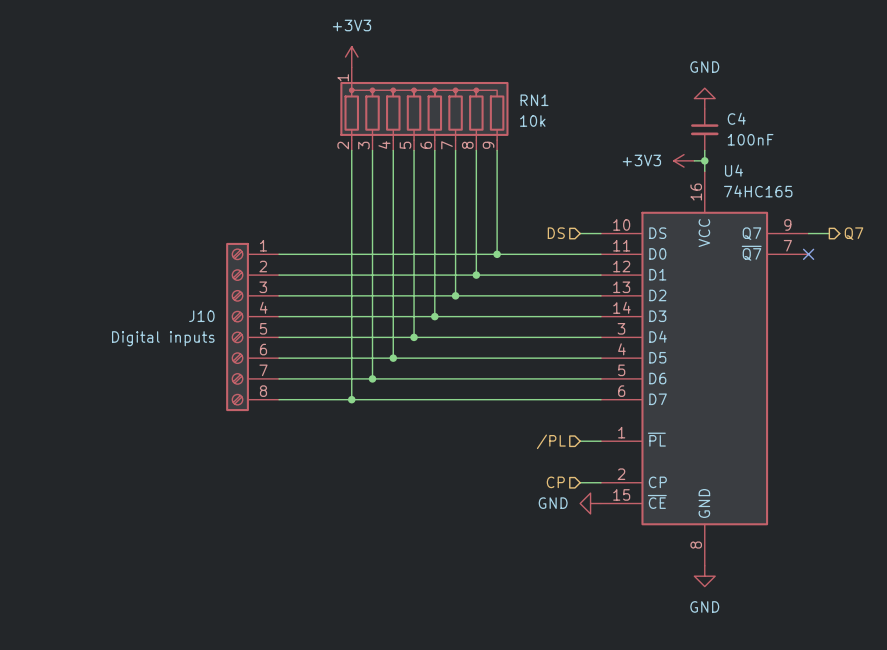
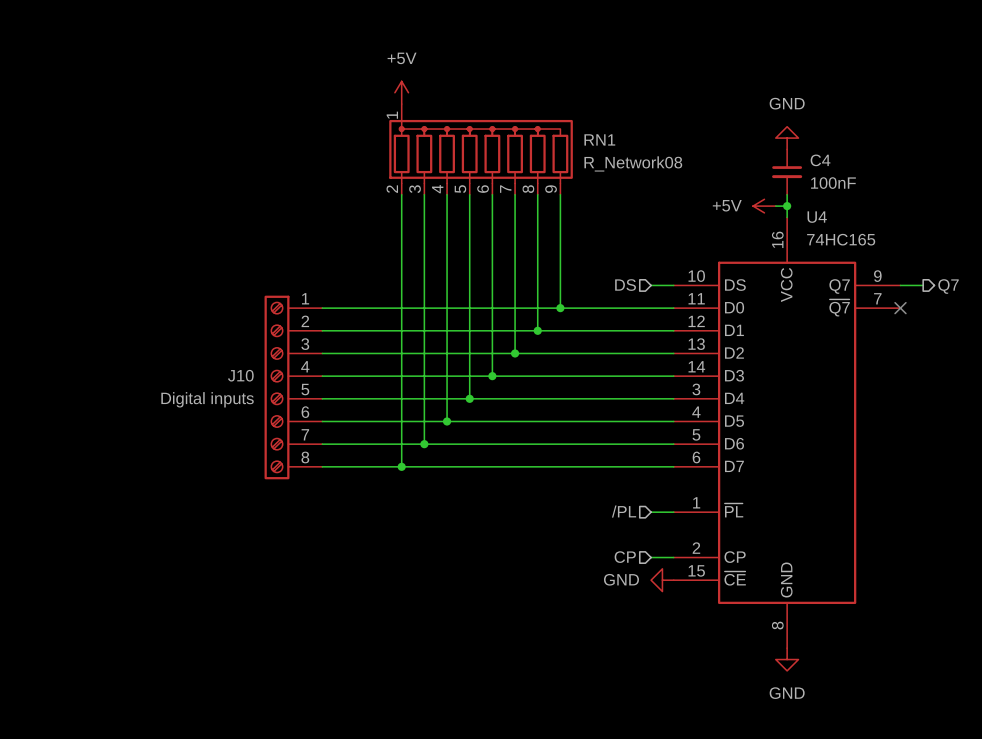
power symbol: +3V3 (351, 57) -> +5V (401, 92)
RN1 value: 10k (532, 121) -> R_Network08 (633, 163)
power symbol: +3V3 (684, 160) -> +5V (764, 206)

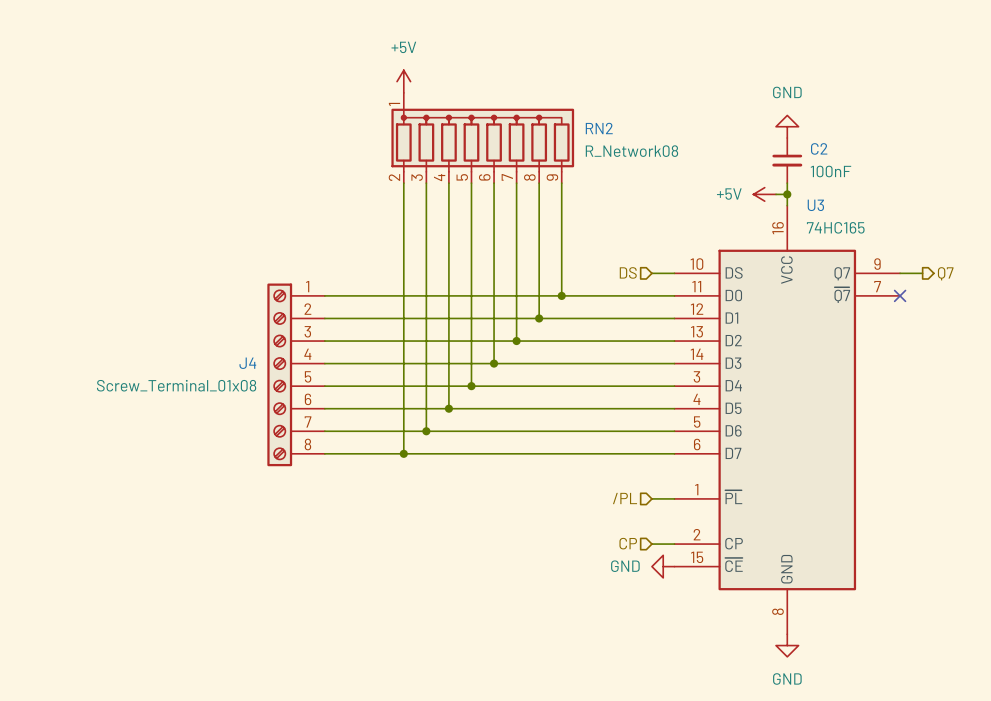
RN1 name: RN1 (599, 139) -> RN2 (599, 128)
C4 name: C4 (820, 160) -> C2 (819, 148)
U4 name: U4 (817, 217) -> U3 (815, 205)
J10 name: J10 (240, 375) -> J4 (247, 363)
J10 value: Digital inputs (207, 399) -> Screw_Terminal_01x08 (176, 385)

